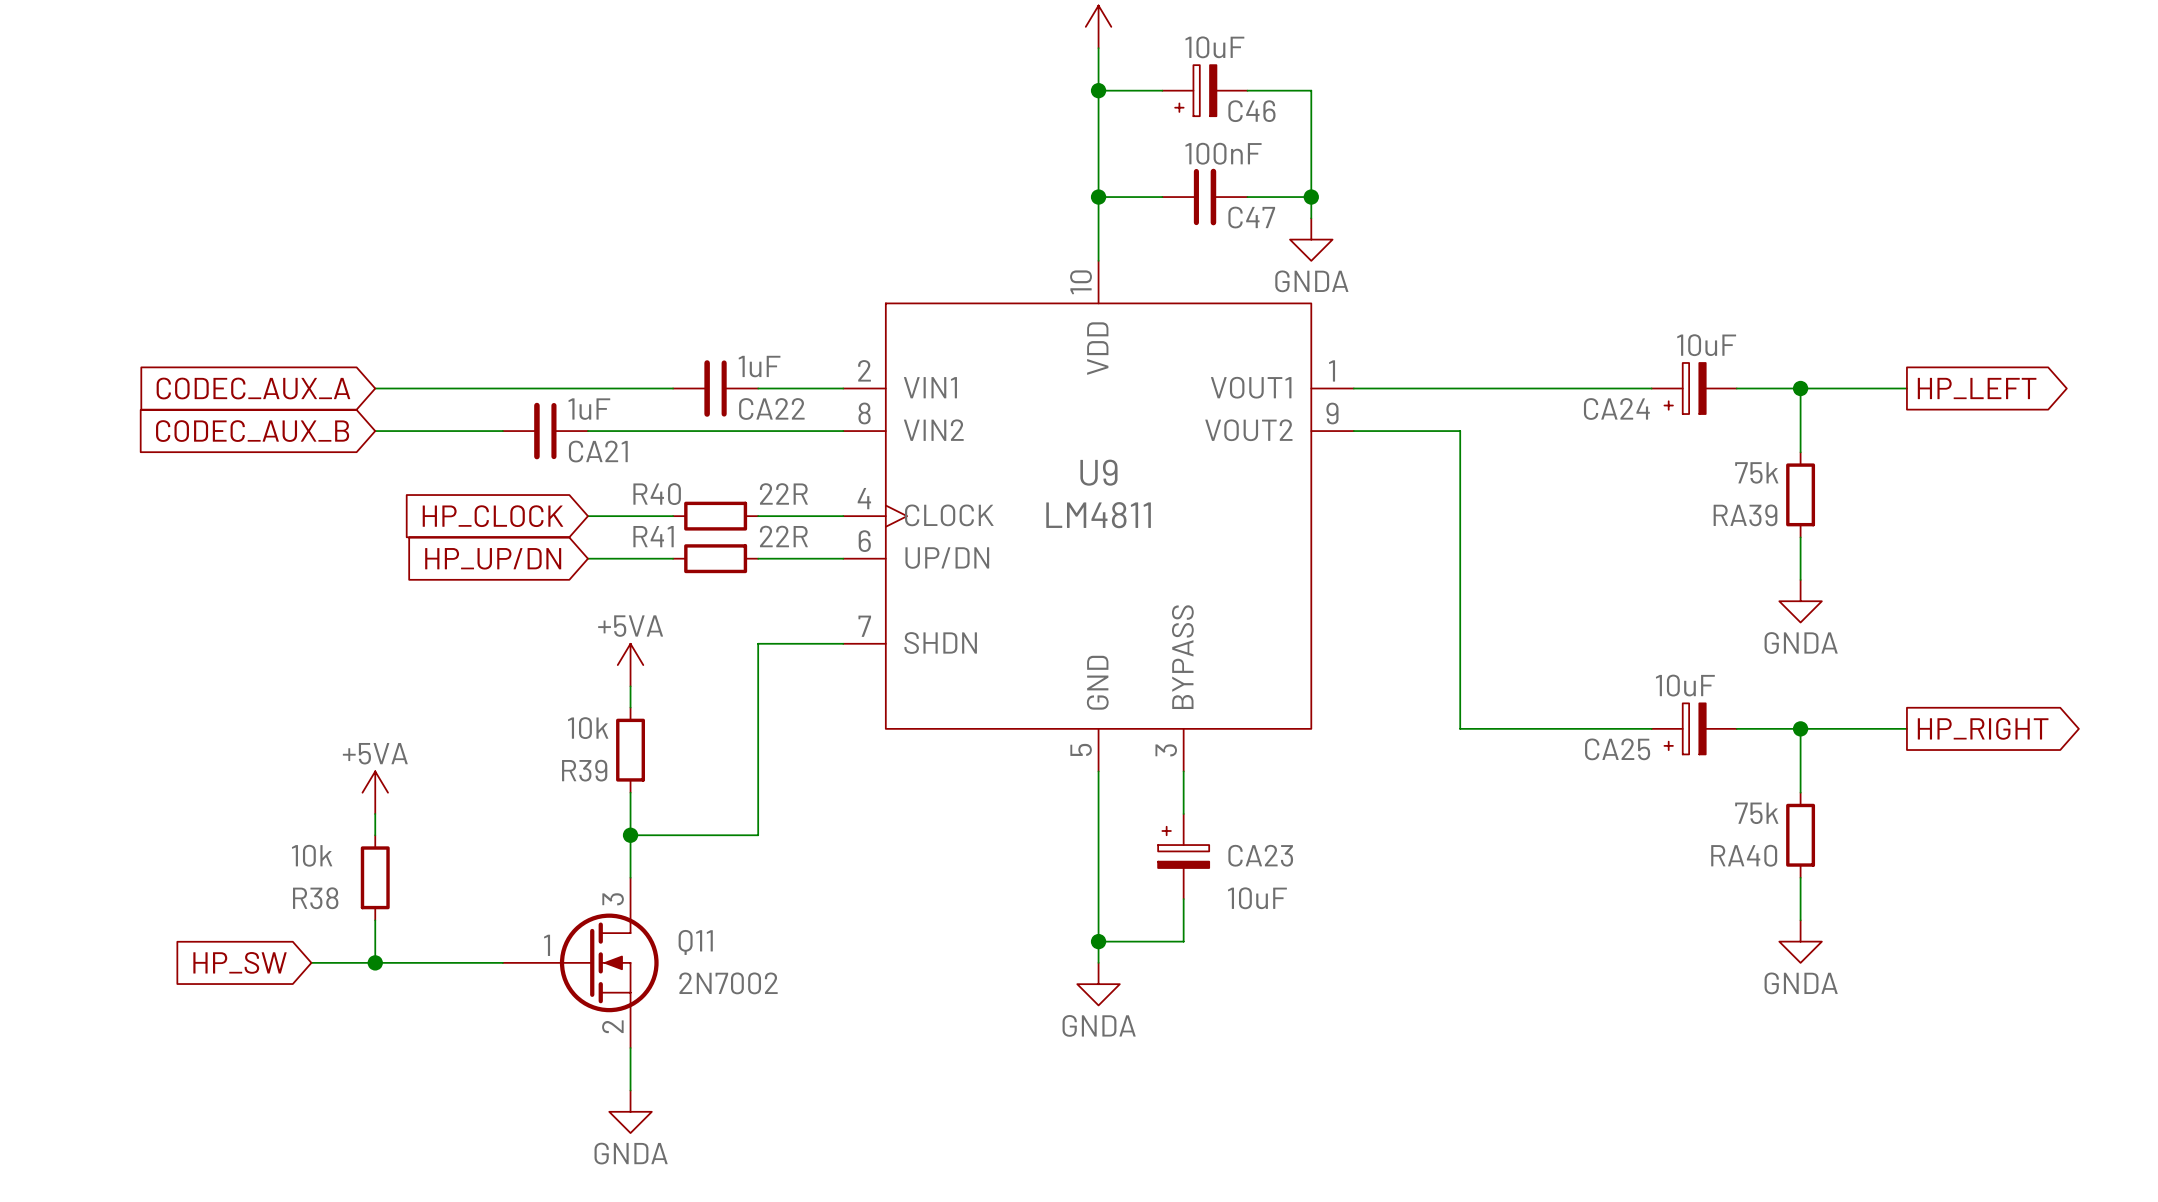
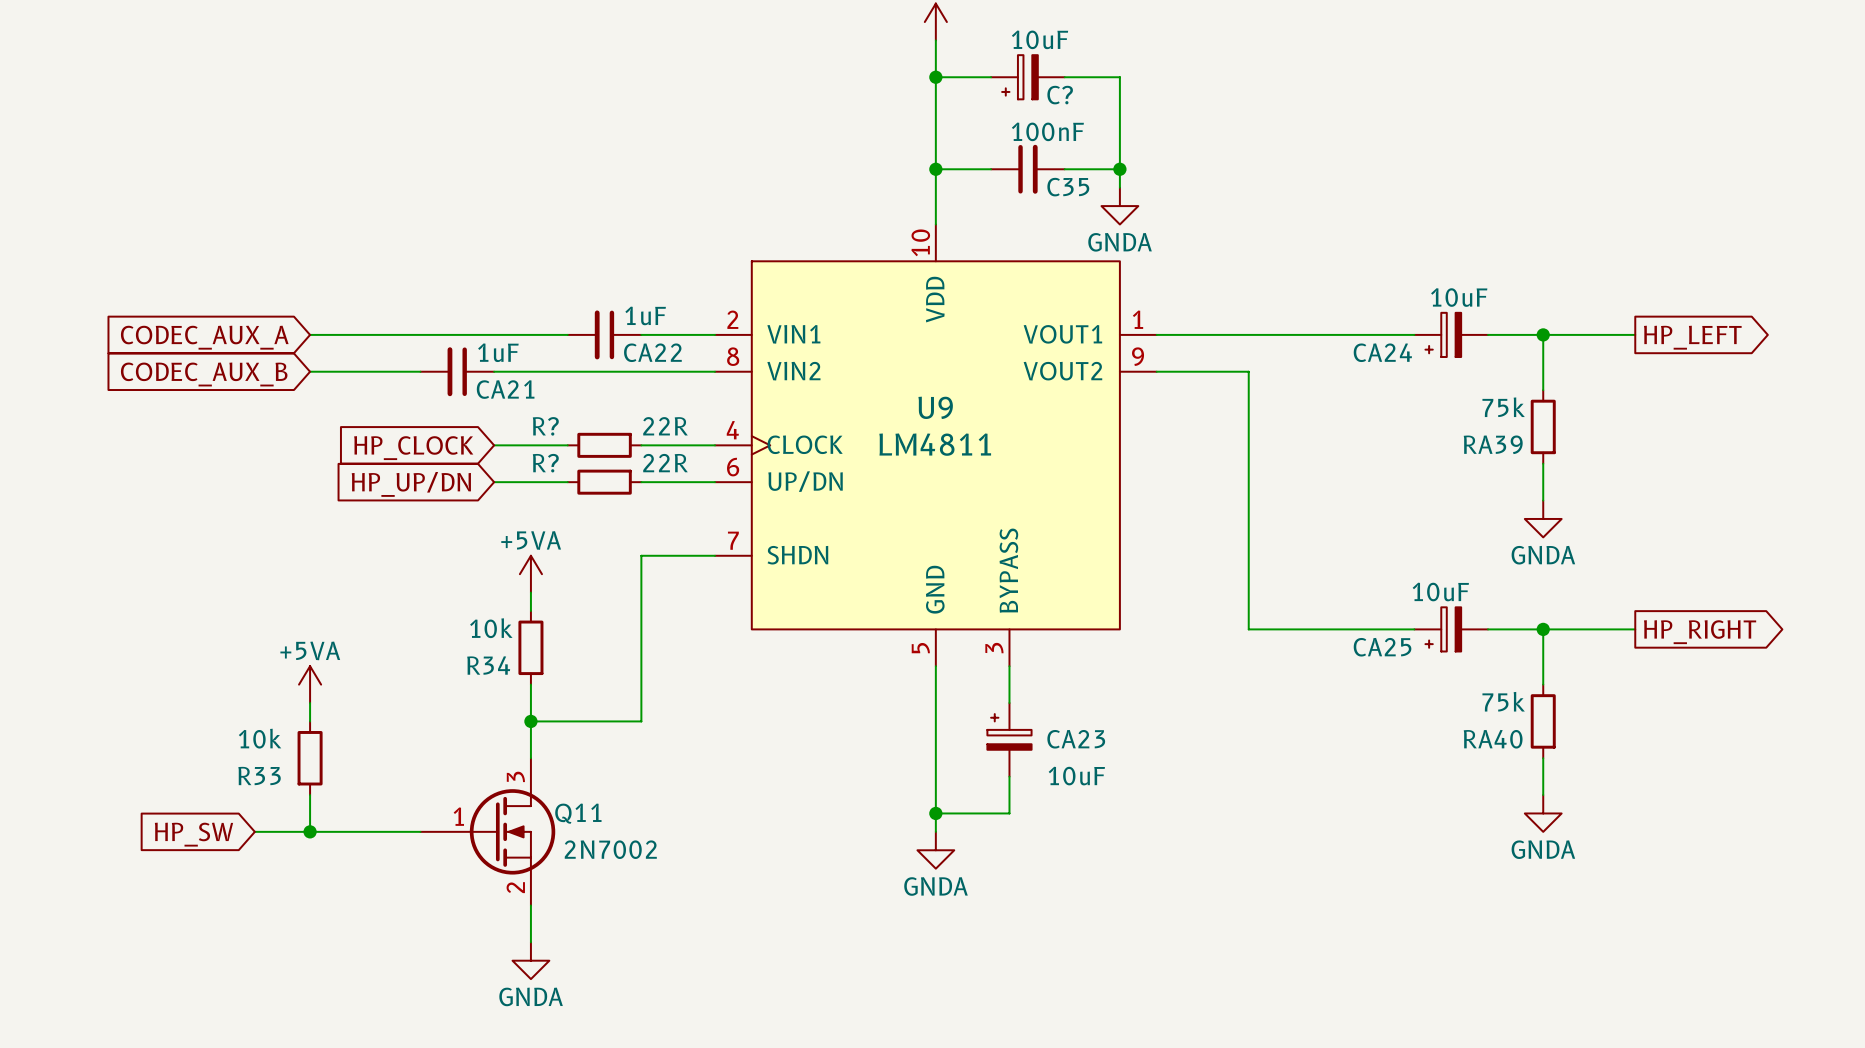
C46 name: C46 (1251, 111) -> C? (1060, 95)
C47 name: C47 (1251, 217) -> C35 (1068, 187)
R40 name: R40 (657, 494) -> R? (545, 426)
R41 name: R41 (653, 536) -> R? (545, 463)
R39 name: R39 (584, 770) -> R34 (488, 665)
R38 name: R38 (315, 898) -> R33 (259, 776)

